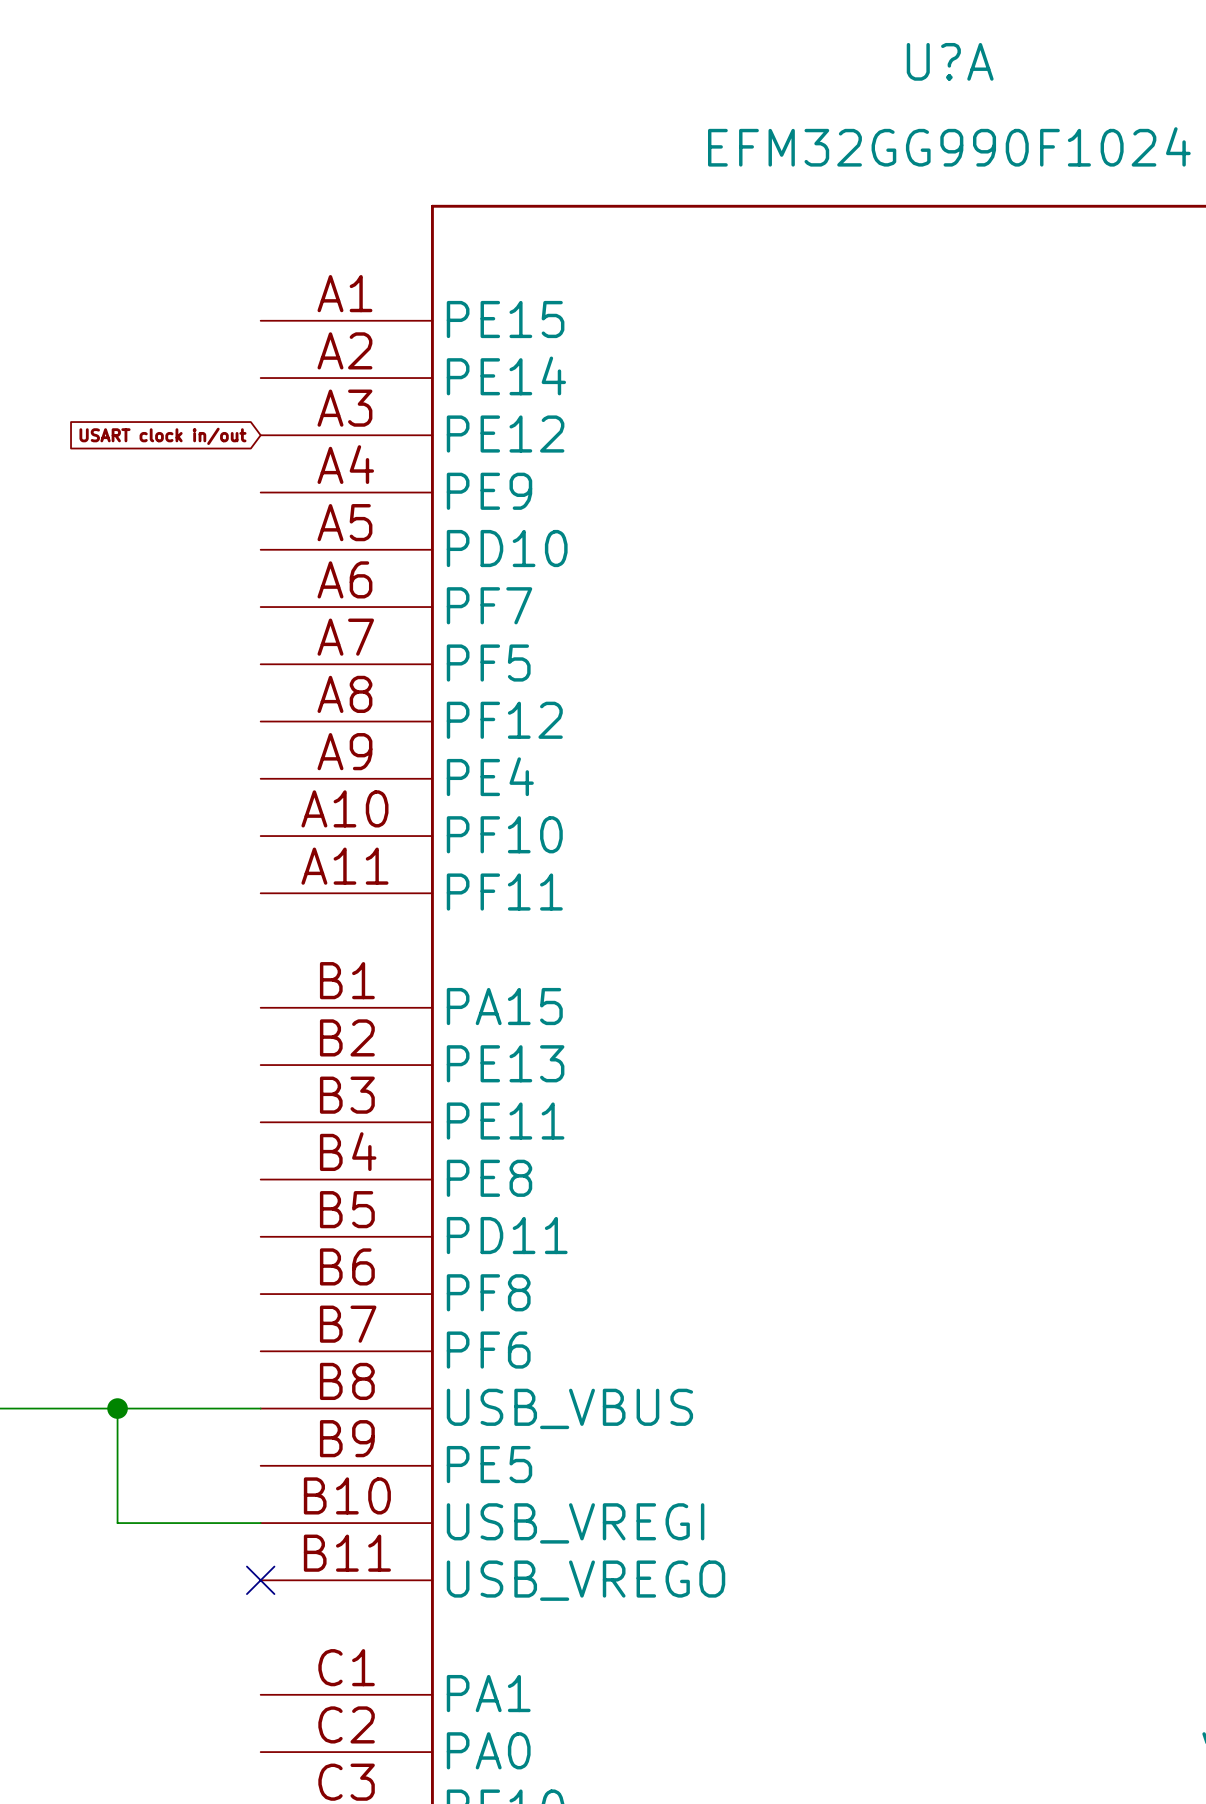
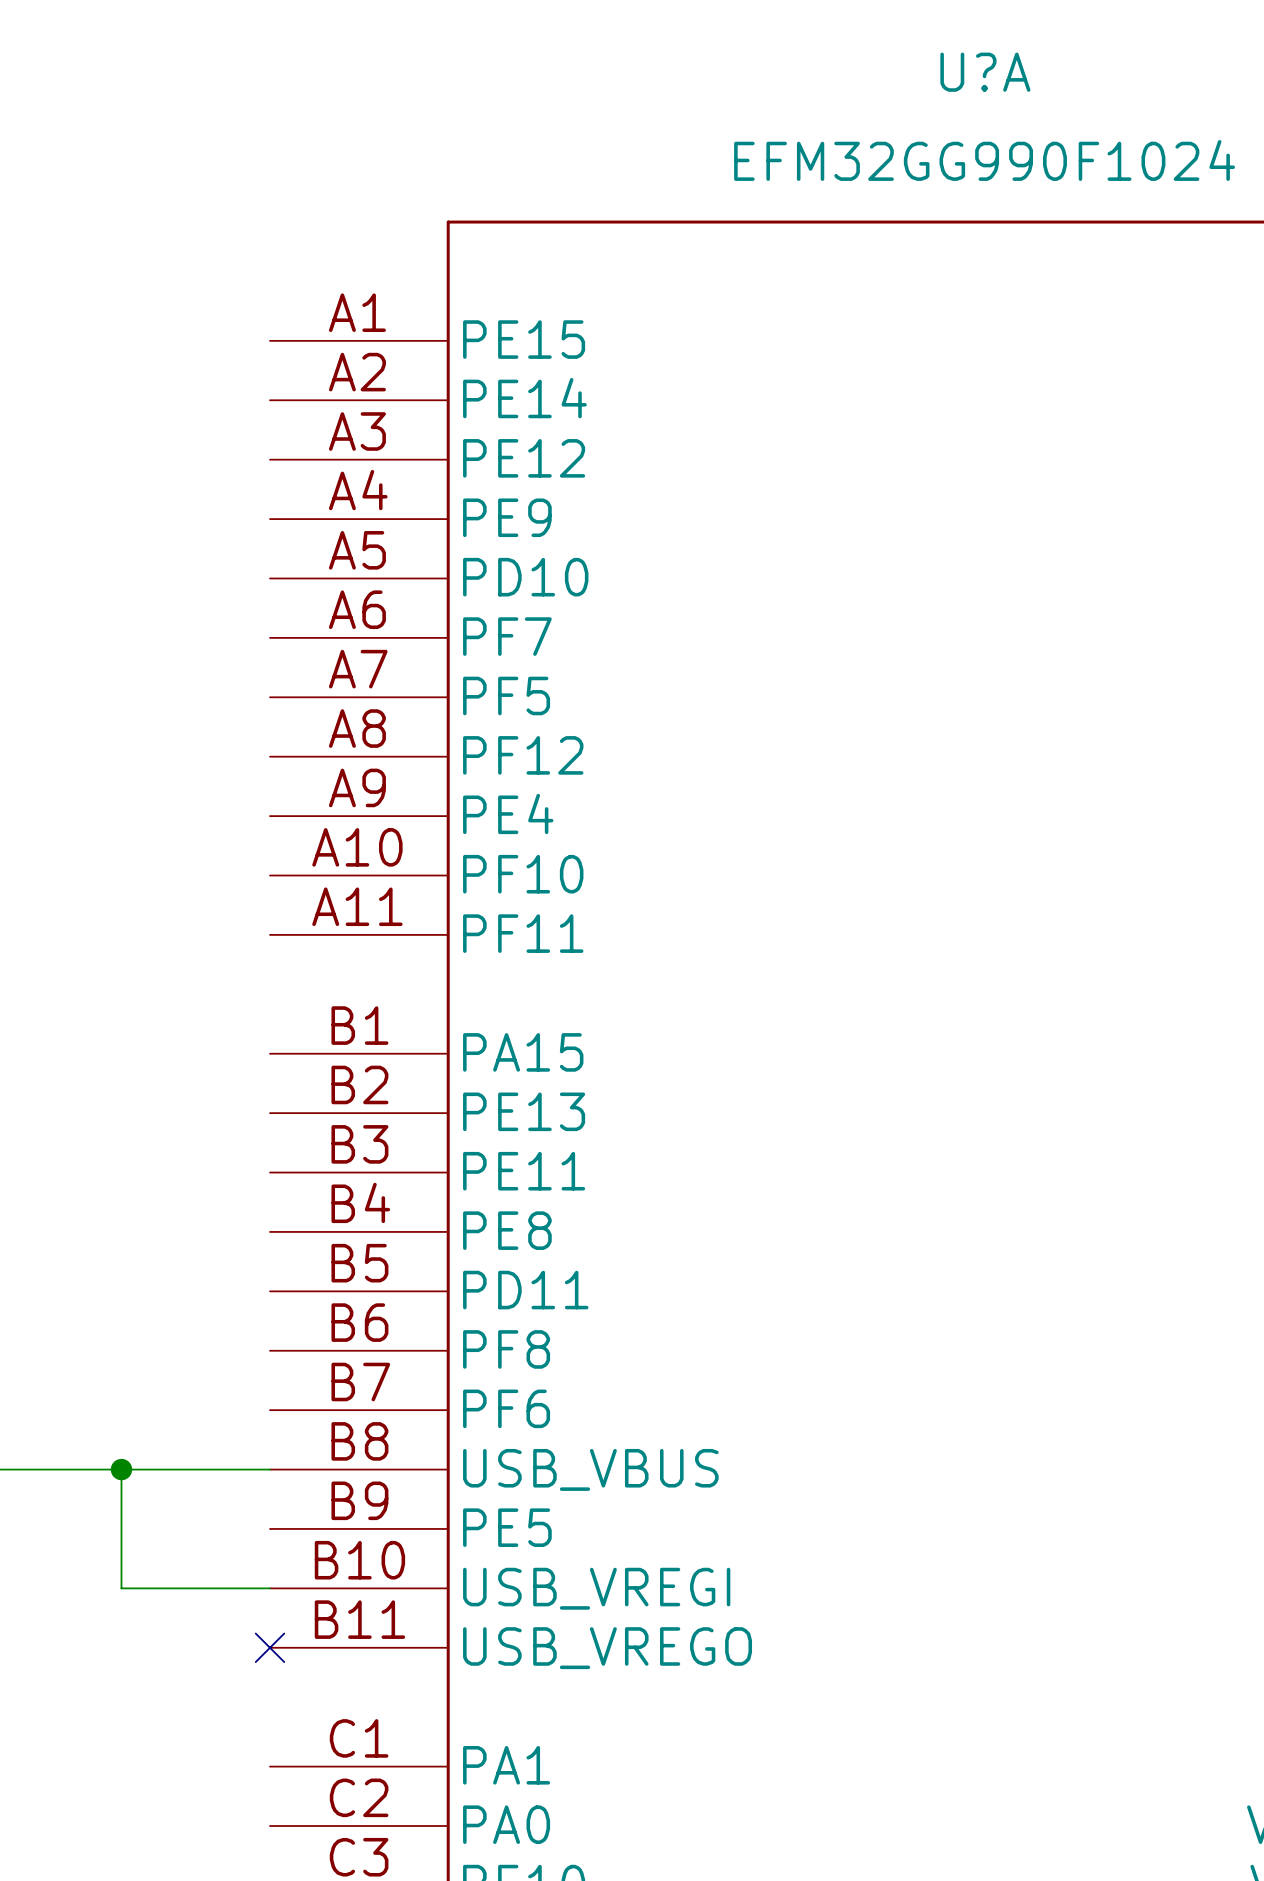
global label: USART clock in/out (162, 436) -> none

